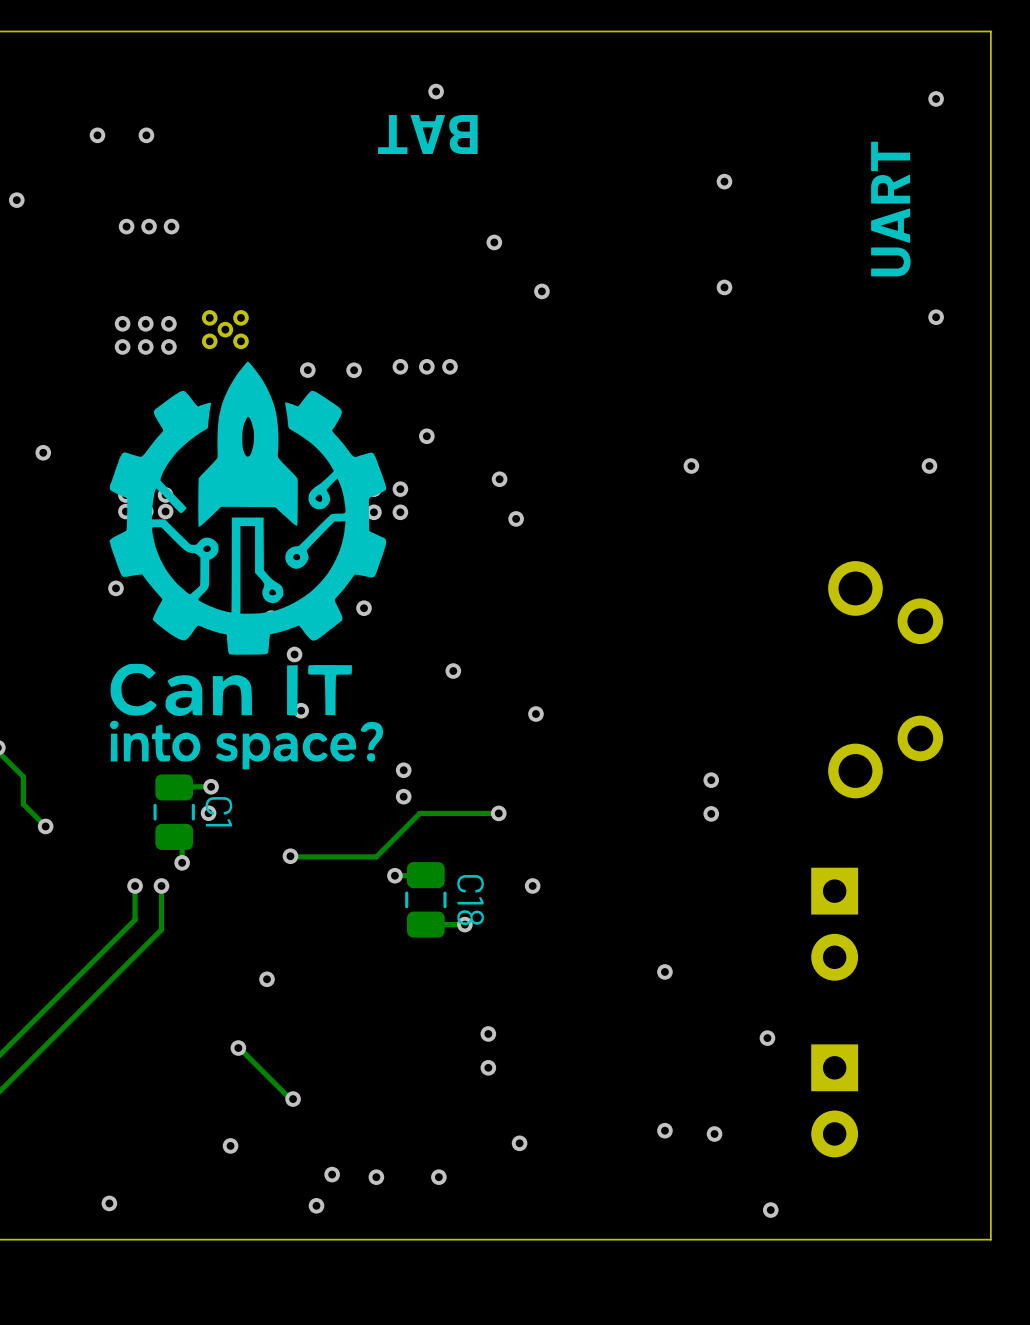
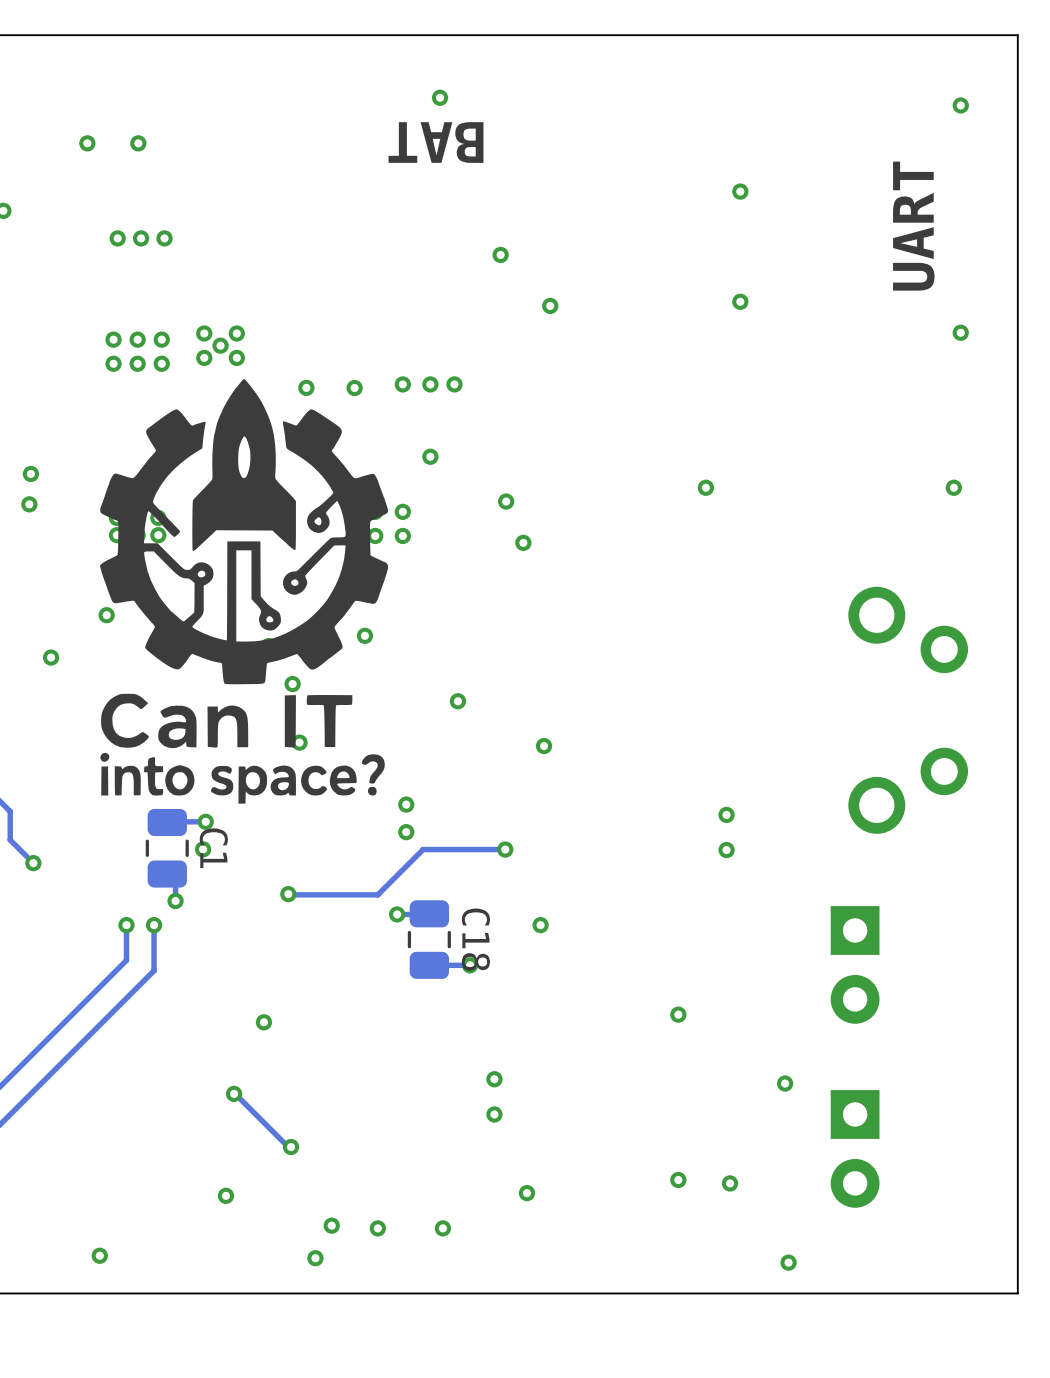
via: none -> (29, 504)
via: none -> (51, 657)

